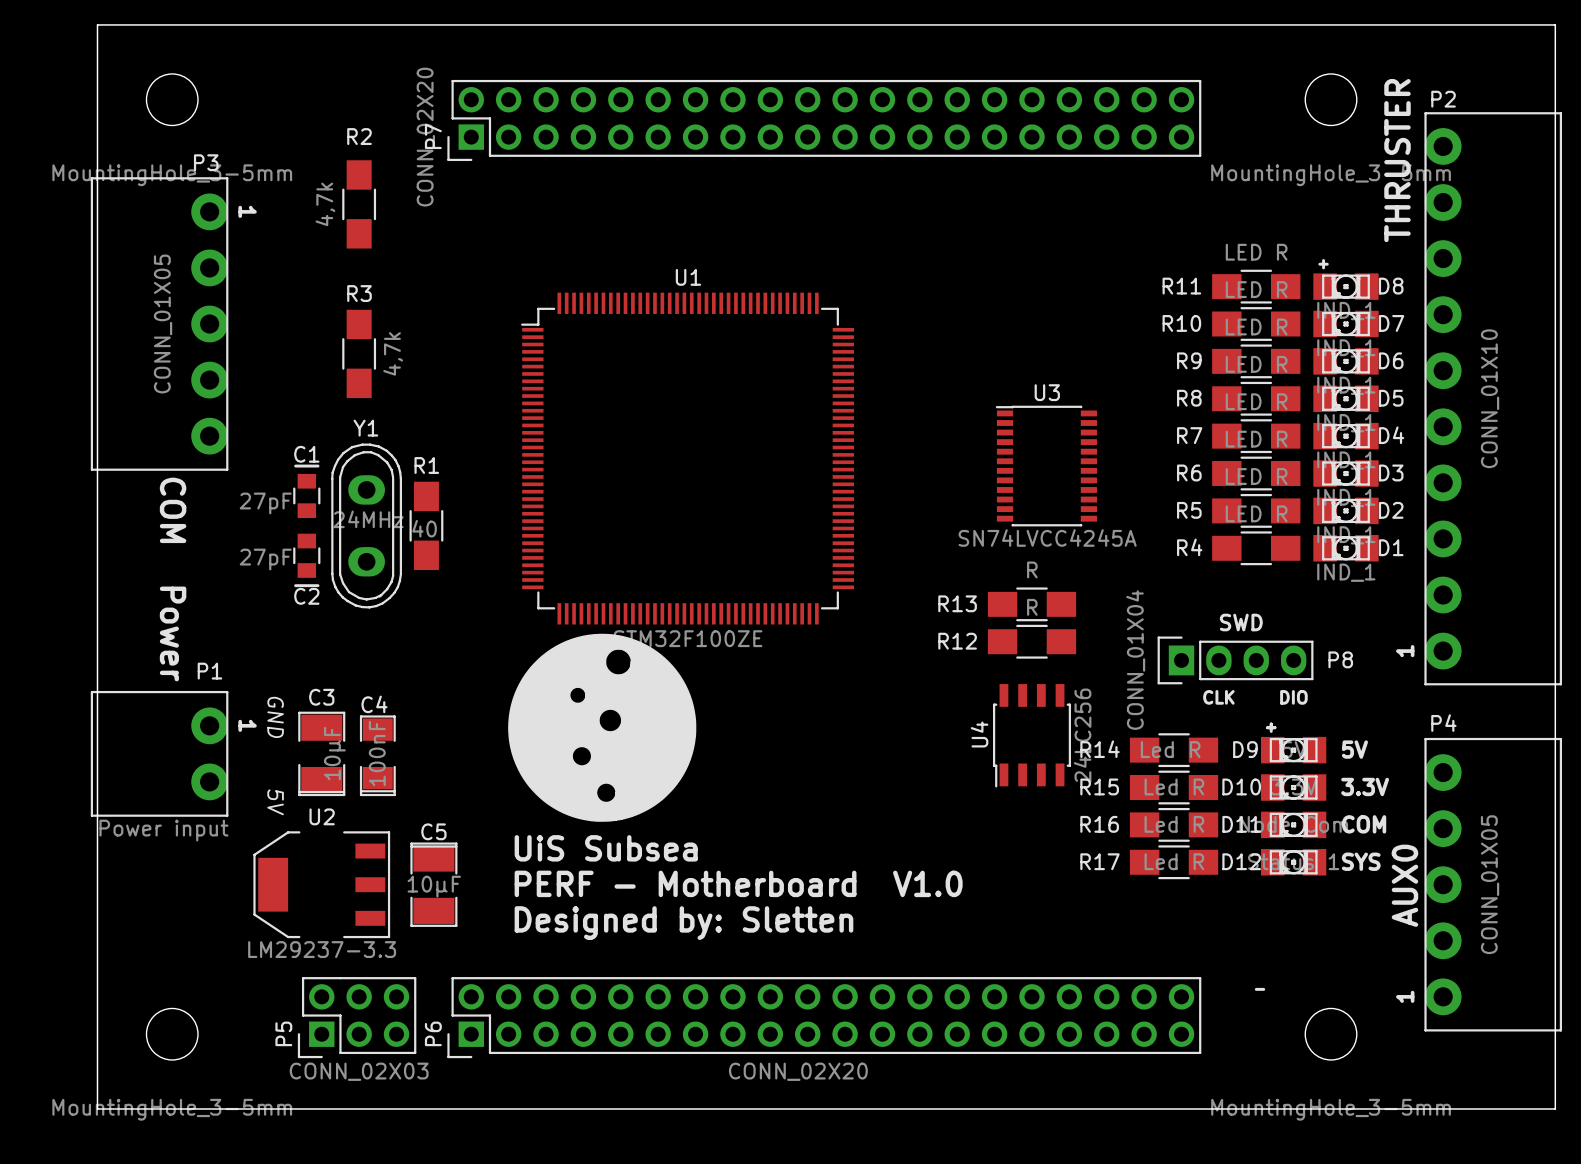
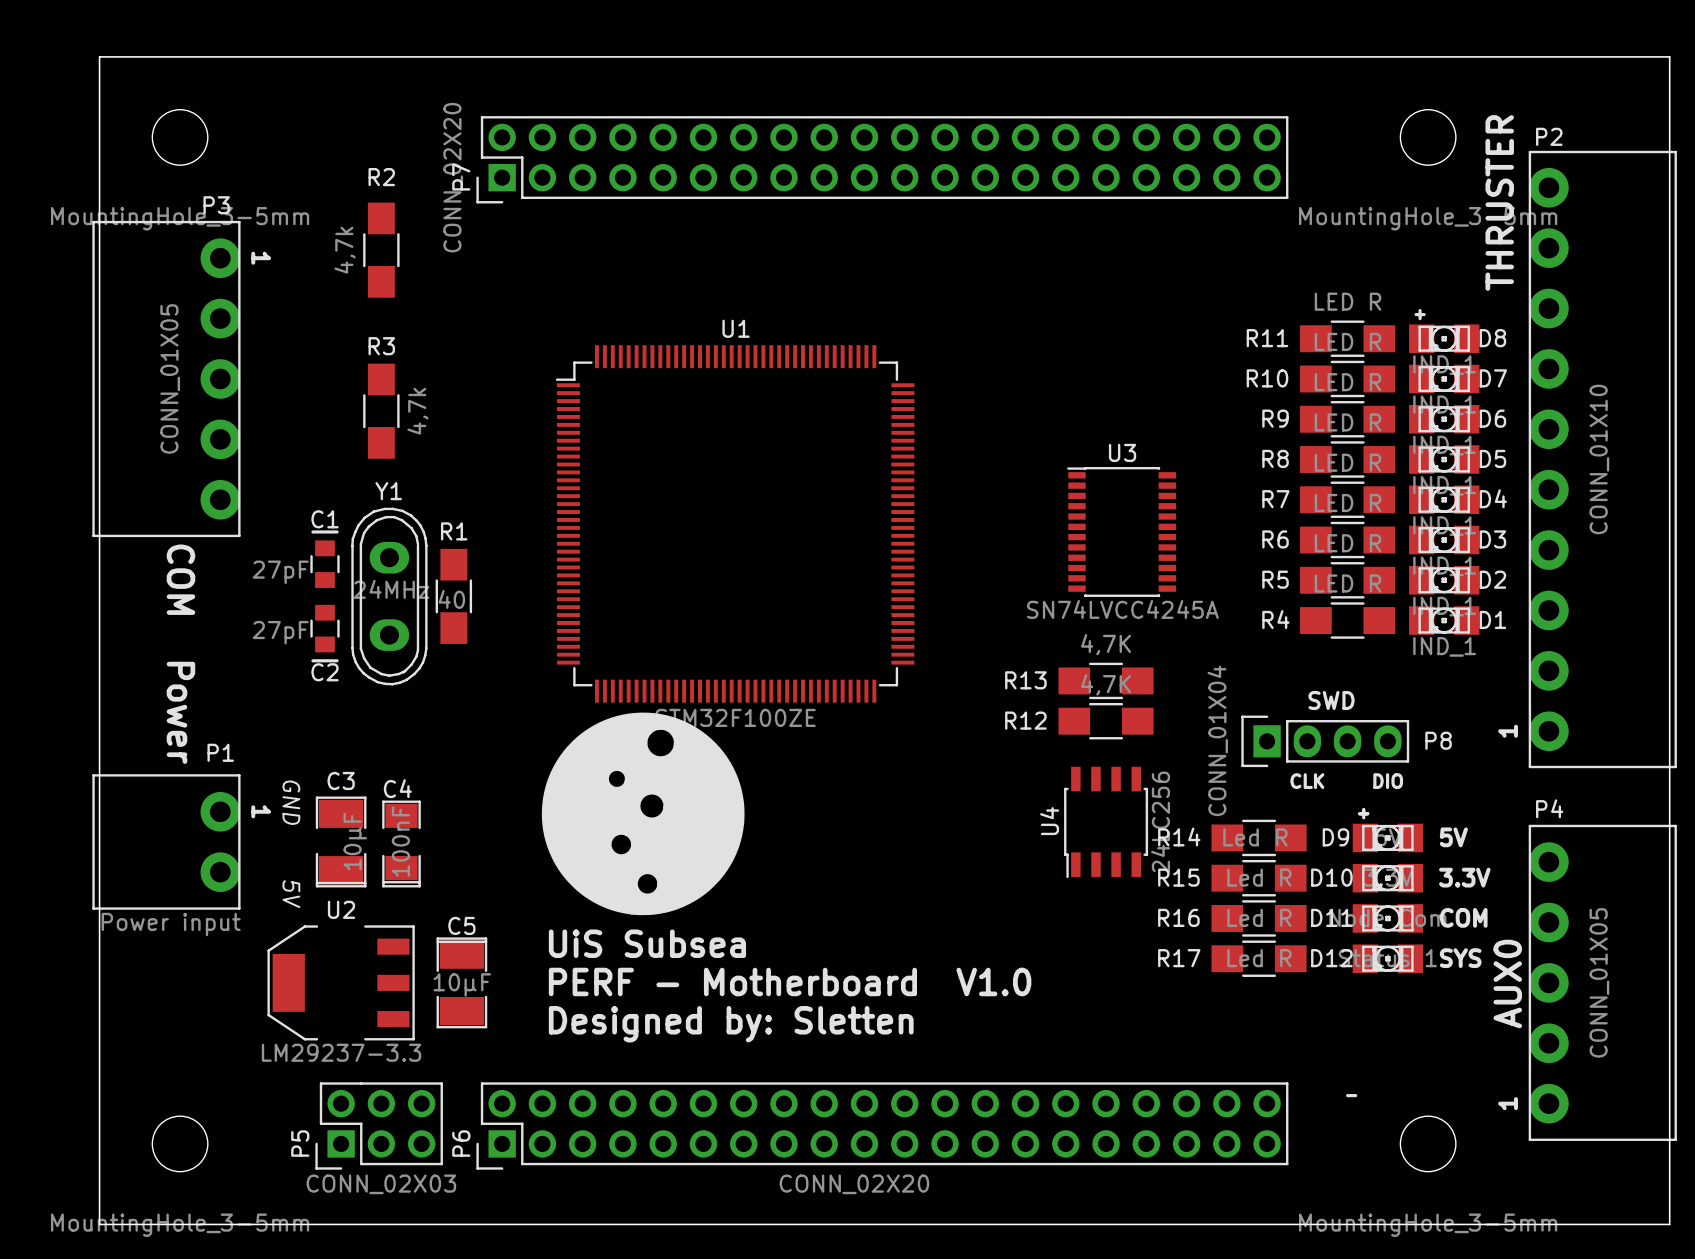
R13 value: R (1032, 569) -> 4,7K (1106, 644)
R12 value: R (1032, 607) -> 4,7K (1106, 684)

